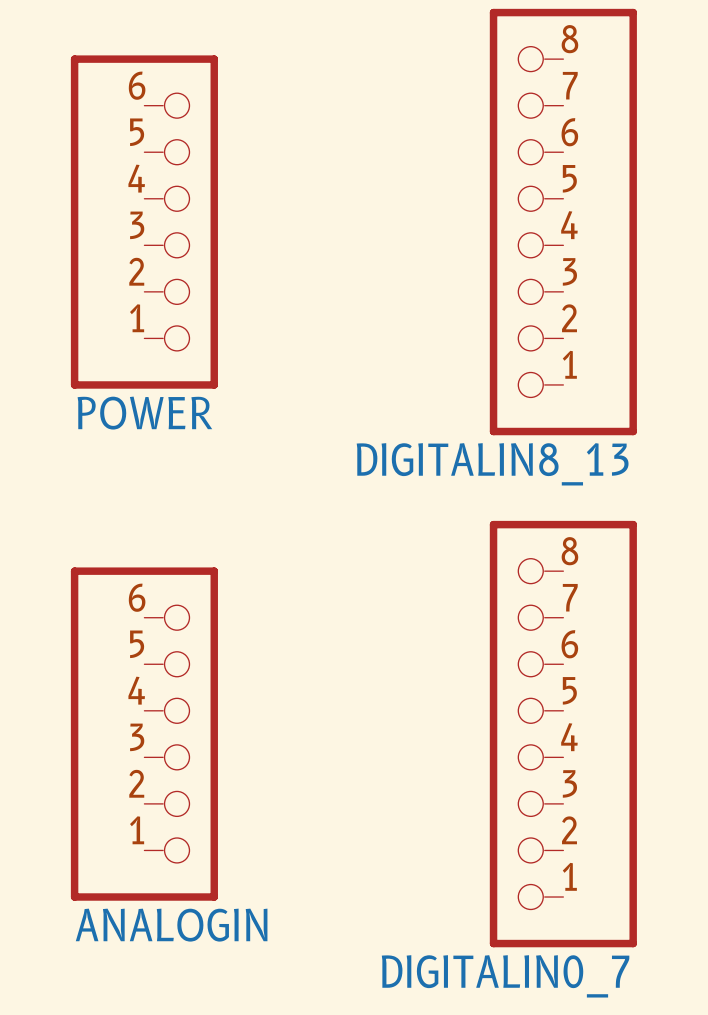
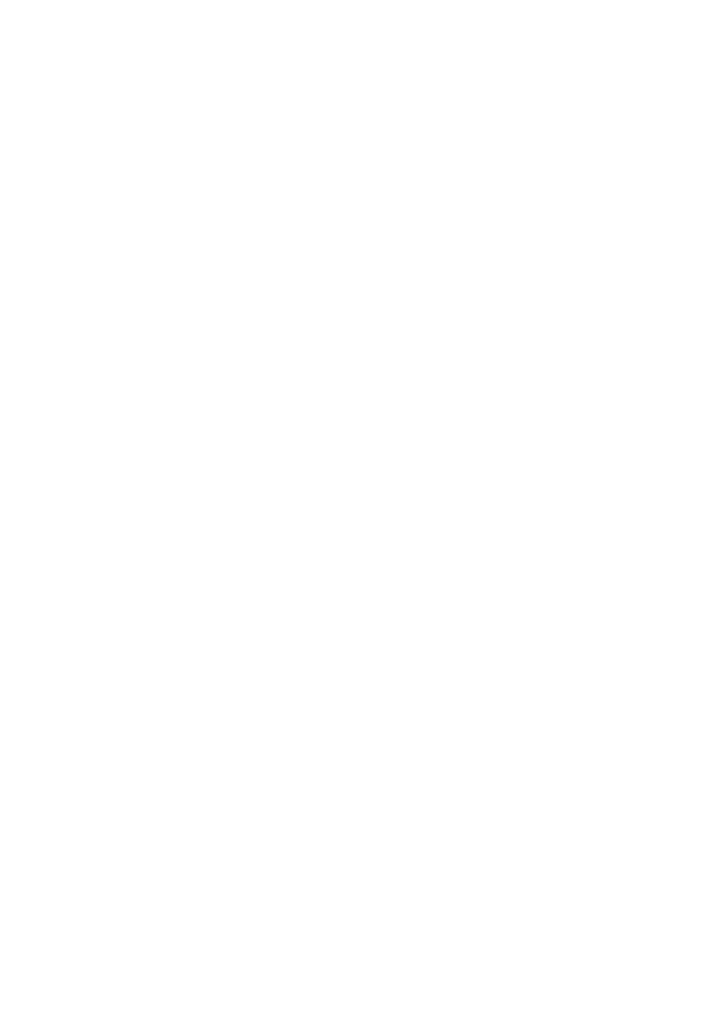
POWER: (144, 222) -> none
DIGITALIN8_13: (563, 222) -> none
ANALOGIN: (144, 734) -> none
DIGITALIN0_7: (563, 734) -> none

